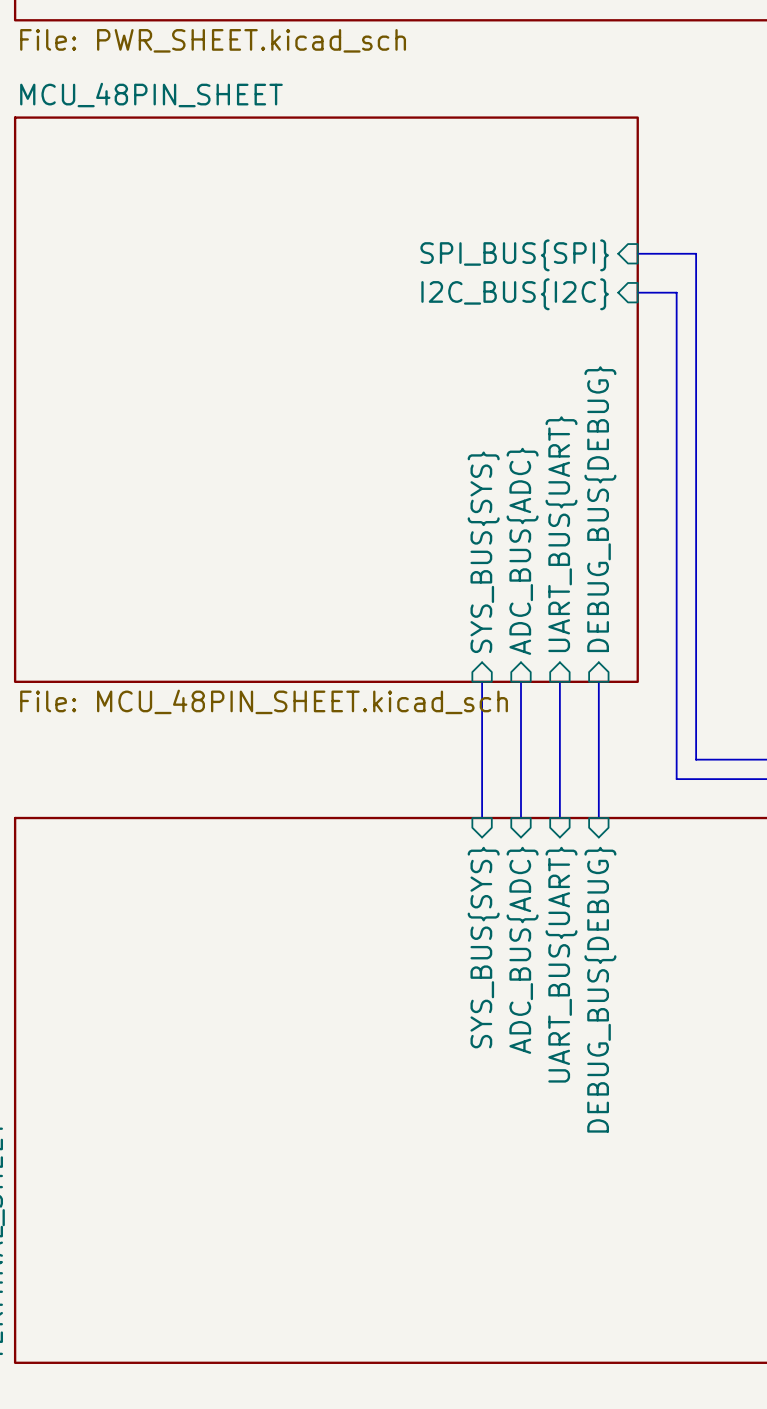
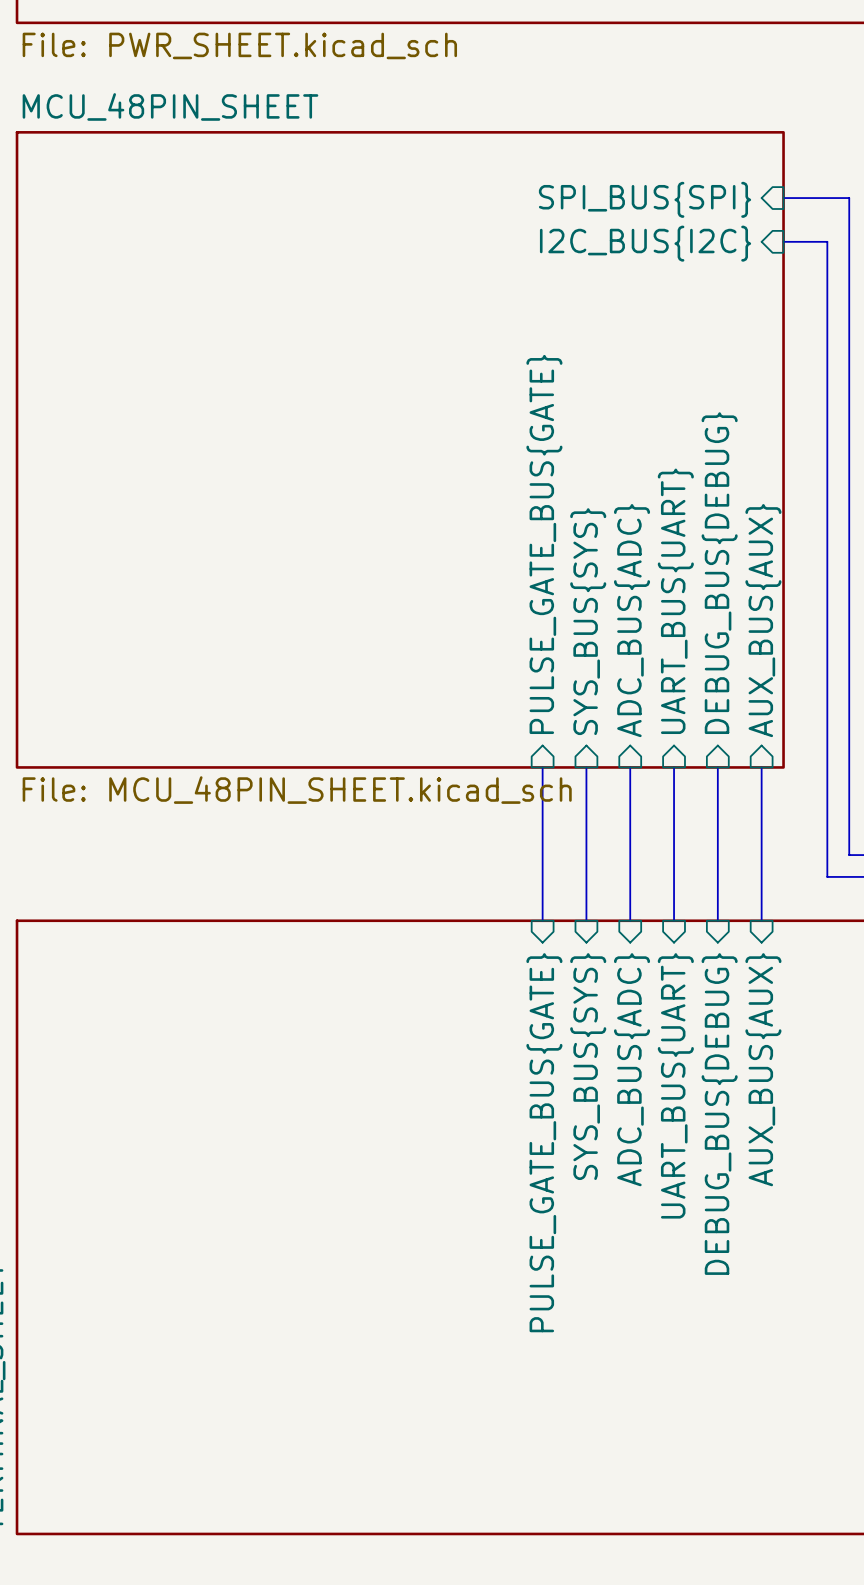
sheet MCU_48PIN_SHEET shape: [13, 116, 639, 683] -> [15, 131, 785, 769]
bus: none -> (783, 241) (827, 241) (827, 876)
bus: (637, 253) (696, 253) (696, 759) (754, 759) -> (783, 198) (849, 198) (849, 855)
sheet pin position: SPI_BUS{SPI} (514, 255) -> SPI_BUS{SPI} (645, 199)
bus: (637, 292) (676, 292) (676, 681) -> none
sheet pin position: I2C_BUS{I2C} (515, 294) -> I2C_BUS{I2C} (645, 243)
sheet pin: DEBUG_BUS{DEBUG} (600, 509) -> UART_BUS{UART} (675, 601)
sheet pin: none -> DEBUG_BUS{DEBUG} (719, 573)
sheet pin: UART_BUS{UART} (561, 534) -> ADC_BUS{ADC} (632, 620)
sheet pin: ADC_BUS{ADC} (522, 551) -> SYS_BUS{SYS} (588, 621)
sheet pin: none -> AUX_BUS{AUX} (763, 620)
sheet pin: SYS_BUS{SYS} (483, 552) -> PULSE_GATE_BUS{GATE} (544, 544)
bus: none -> (717, 767) (717, 920)
bus: (676, 779) (735, 779) -> (761, 876) (761, 920)
sheet pin: SYS_BUS{SYS} (483, 947) -> PULSE_GATE_BUS{GATE} (544, 1142)
sheet pin: ADC_BUS{ADC} (522, 950) -> SYS_BUS{SYS} (588, 1066)
sheet pin: none -> AUX_BUS{AUX} (763, 1069)
sheet pin: UART_BUS{UART} (561, 964) -> ADC_BUS{ADC} (632, 1069)
sheet pin: DEBUG_BUS{DEBUG} (600, 989) -> UART_BUS{UART} (675, 1085)
sheet pin: none -> DEBUG_BUS{DEBUG} (719, 1114)

